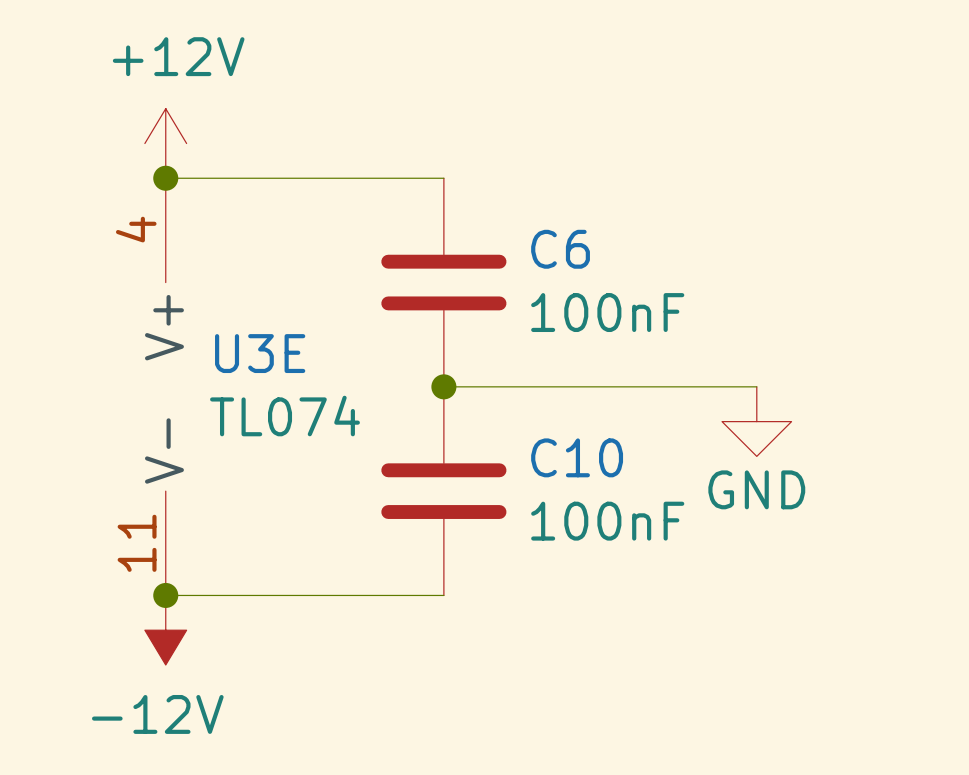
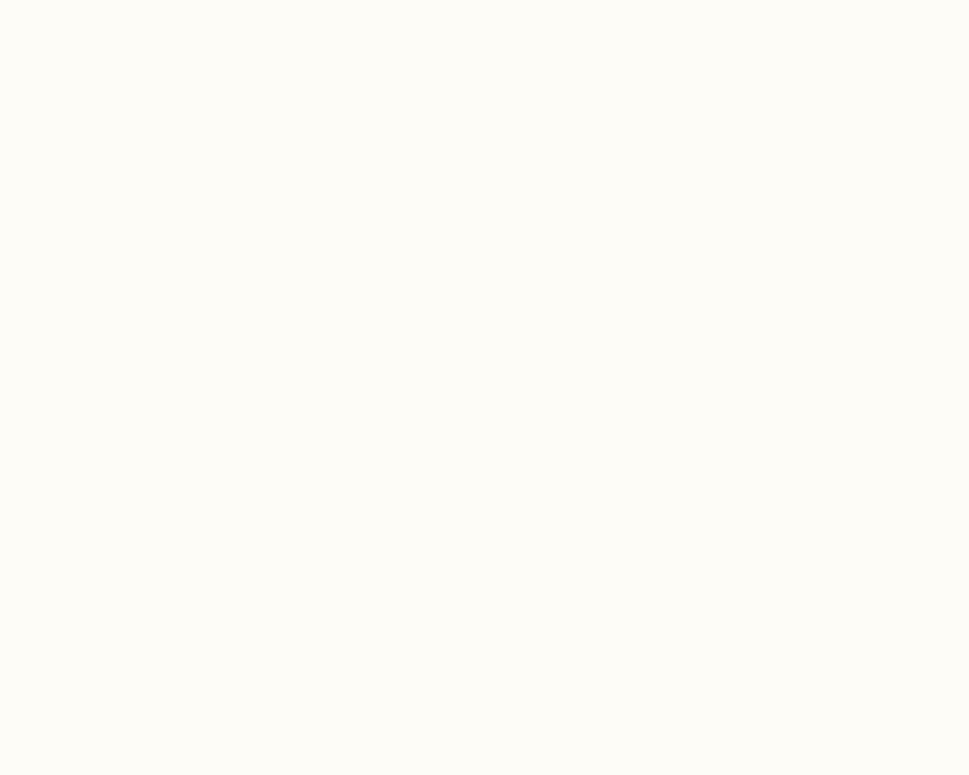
power symbol: +12V (165, 143) -> none
wire: (165, 178) (443, 178) -> none
junction: (165, 178) -> none
C6: 100nF (443, 282) -> none
U3E: TL074 (165, 386) -> none
wire: (443, 386) (756, 386) -> none
junction: (443, 386) -> none
power symbol: GND (756, 421) -> none
C10: 100nF (443, 491) -> none
wire: (165, 595) (443, 595) -> none
junction: (165, 595) -> none
power symbol: -12V (165, 630) -> none

